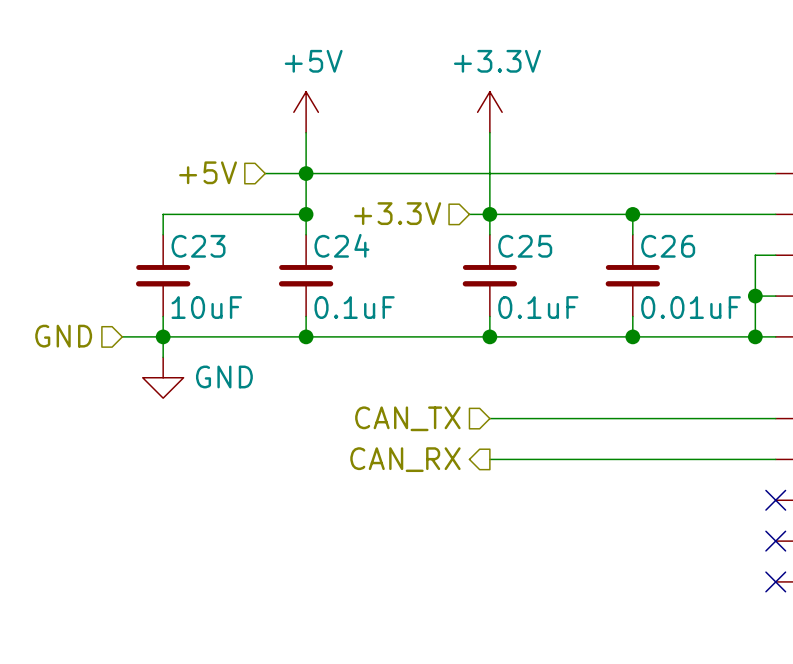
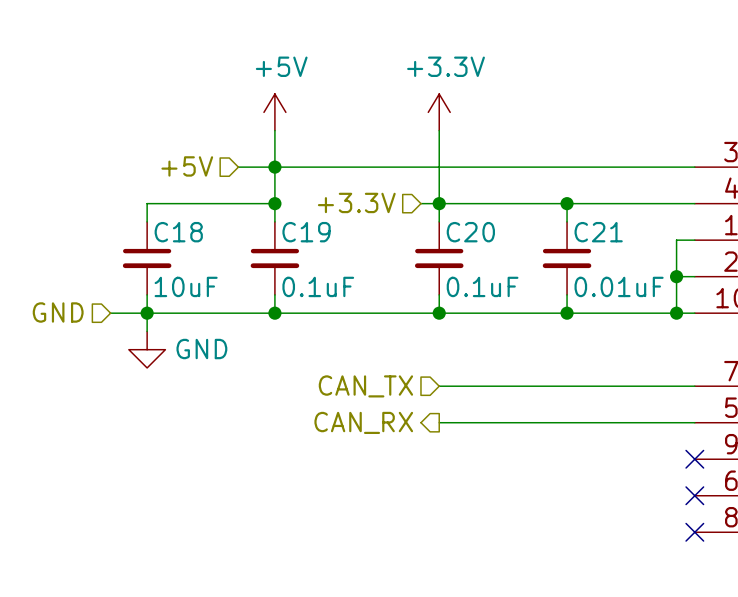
C24 name: C24 (341, 245) -> C19 (306, 232)
C23 name: C23 (198, 246) -> C18 (178, 232)
C25 name: C25 (525, 246) -> C20 (470, 232)
C26 name: C26 (668, 246) -> C21 (598, 232)

